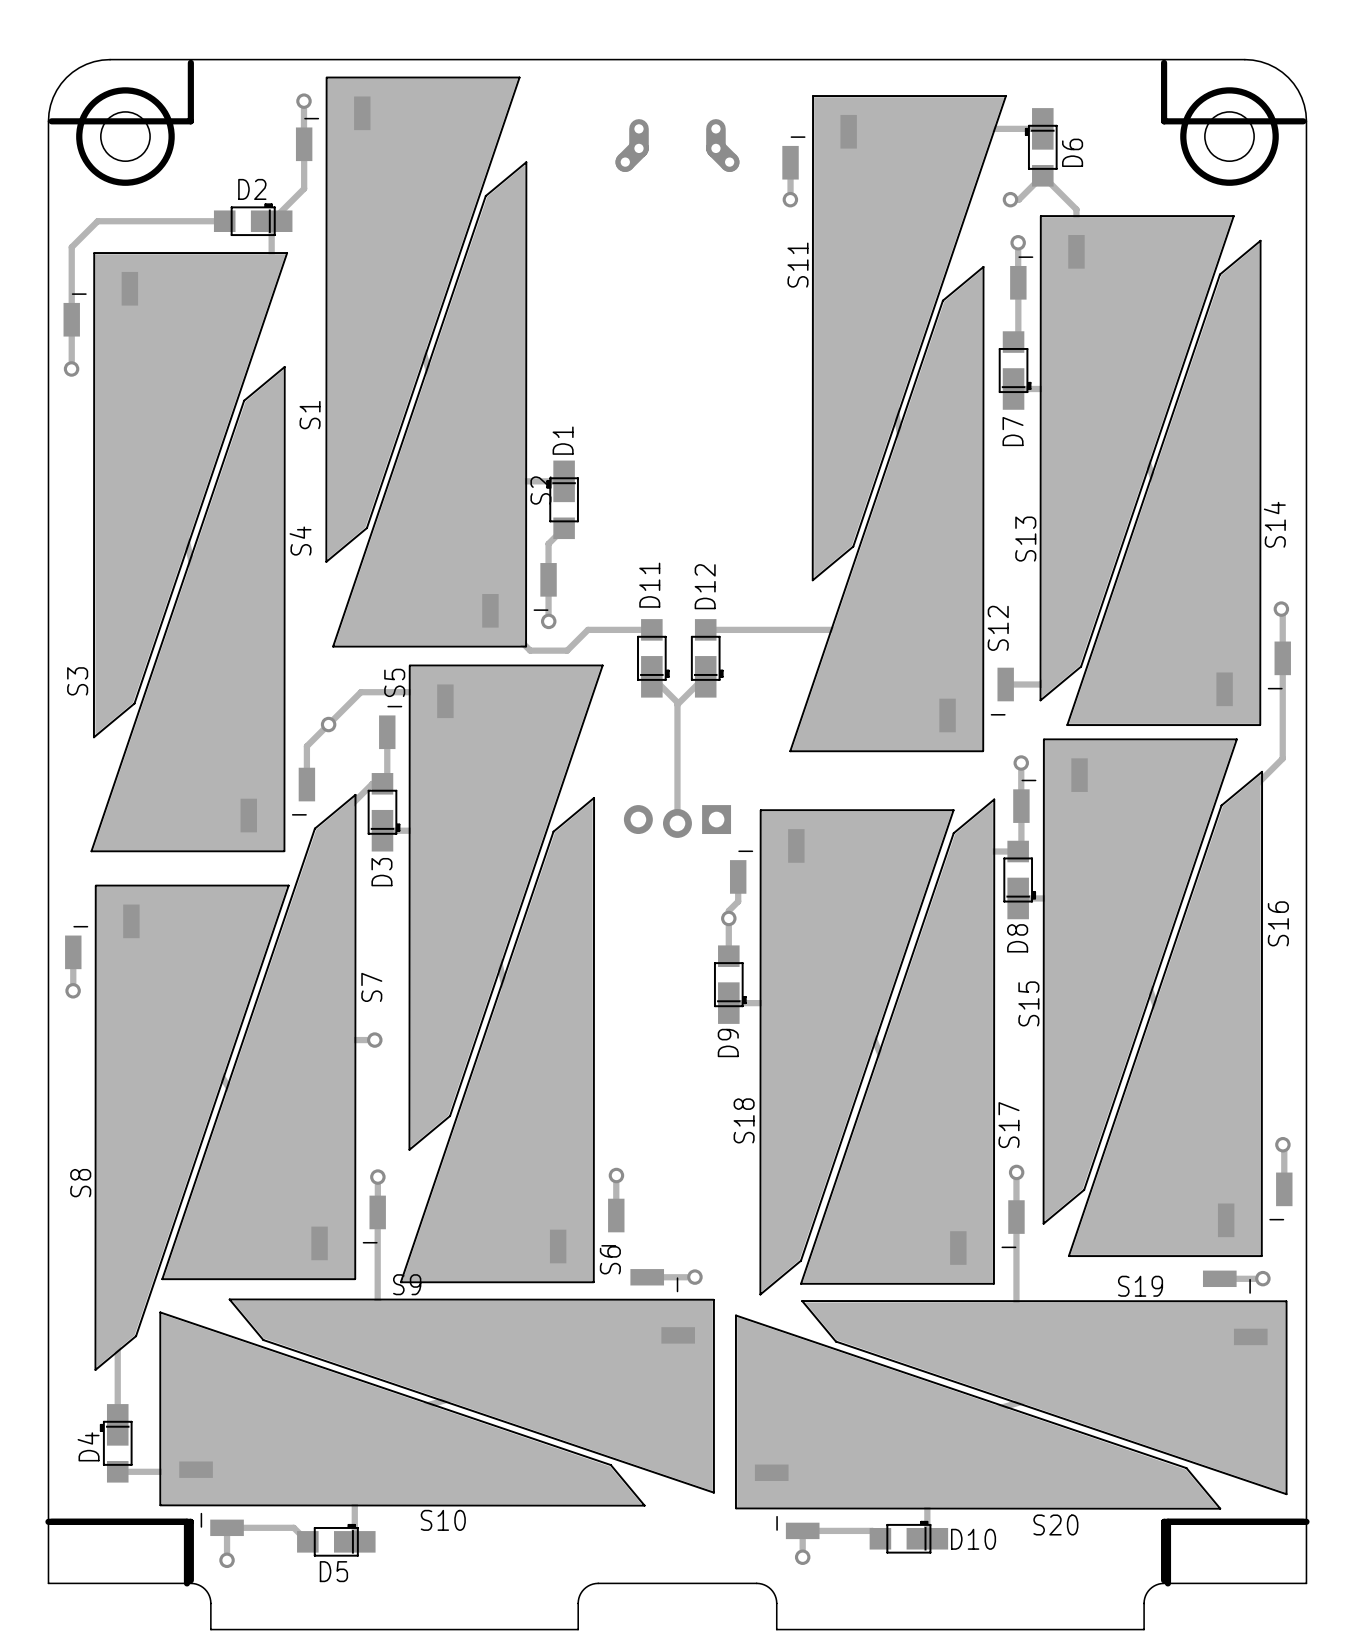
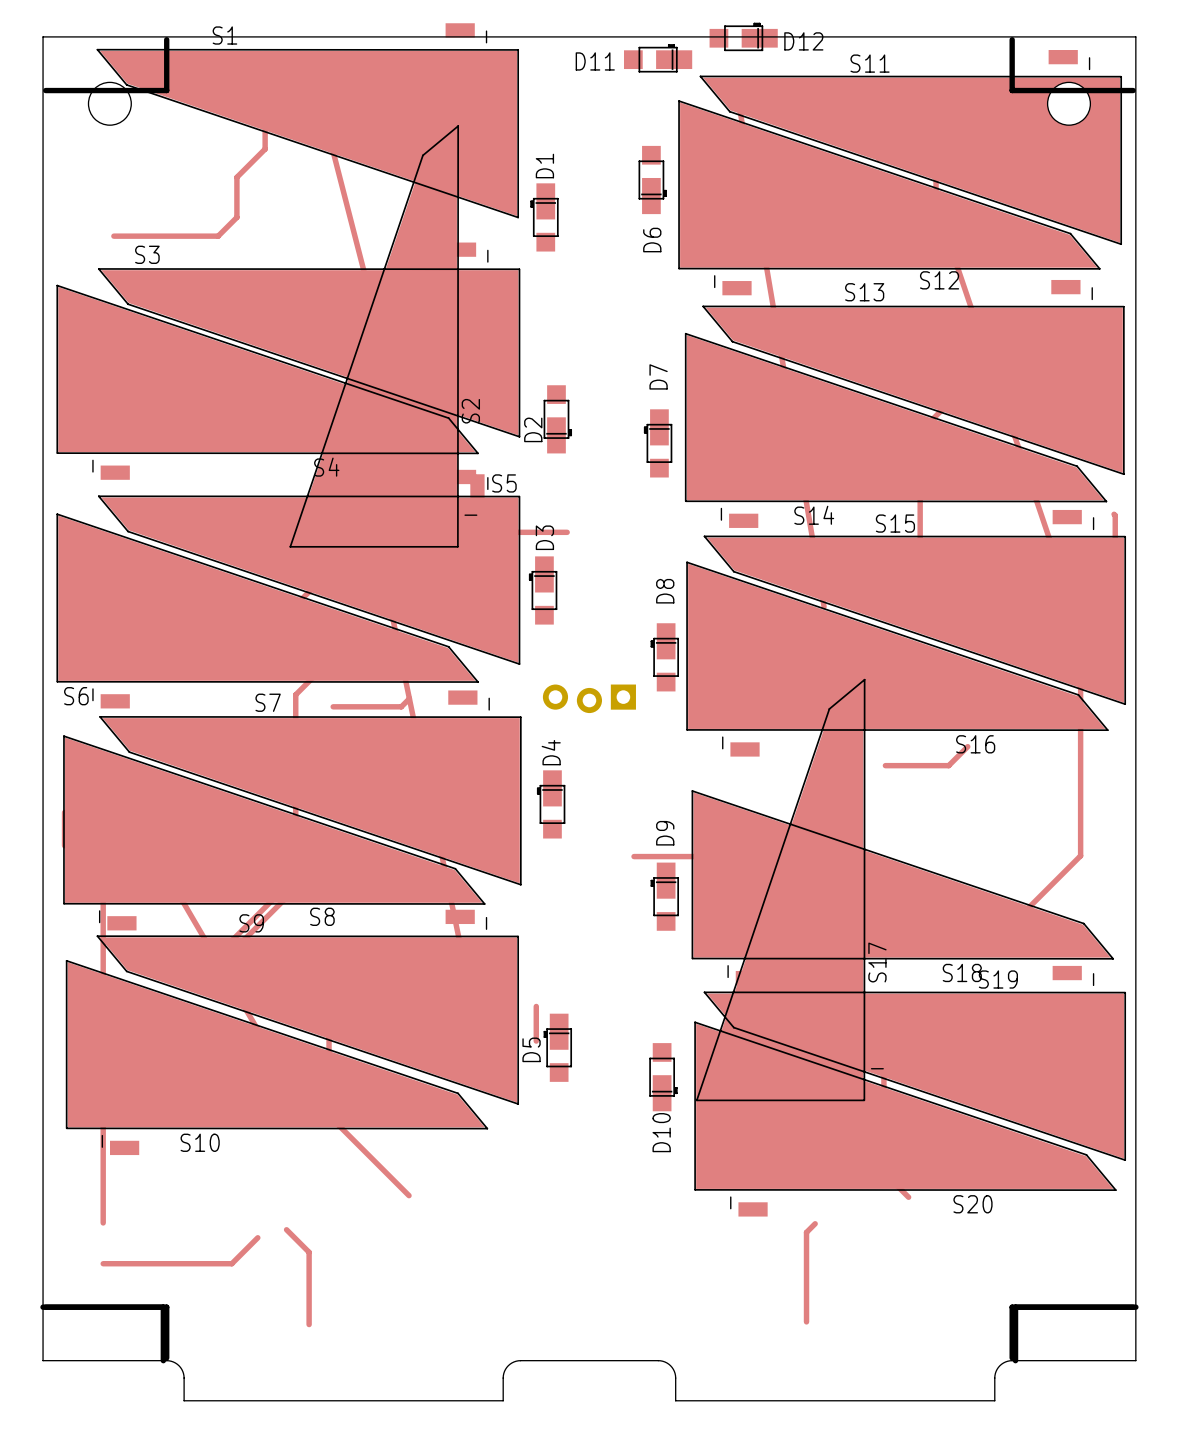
board edge: (110, 59) (86, 64) (66, 77) (53, 97) (48, 121) -> (96, 36) (43, 36) (43, 90)
board edge: (1244, 59) (1268, 64) (1288, 77) (1301, 97) (1306, 121) -> (1082, 36) (1135, 36) (1135, 90)
S1 footprint: [295, 76, 521, 563] -> [96, 23, 520, 219]
drawing: [76, 87, 175, 186] -> none
drawing: [1180, 87, 1279, 186] -> none
S11 footprint: [782, 95, 1007, 582] -> [699, 49, 1123, 246]
via: (303, 101) -> none
part: (632, 145) -> none
part: (722, 145) -> none
D6 rotation: 0° (1041, 147) -> 180° (652, 180)
D6 position: (1041, 147) -> (652, 180)
D6 name position: D6 (1072, 152) -> D6 (652, 240)
D2 name position: D2 (252, 189) -> D2 (533, 429)
via: (790, 199) -> none
via: (1010, 199) -> none
S13 footprint: [1010, 215, 1235, 702] -> [702, 279, 1125, 476]
D2 rotation: 0° (253, 219) -> 90° clockwise (557, 419)
D2 position: (253, 219) -> (557, 419)
track: (224, 221) (97, 221) (71, 247) (71, 368) -> none
S14 footprint: [1066, 239, 1291, 727] -> [684, 332, 1108, 528]
via: (1018, 242) -> none
S3 footprint: [63, 252, 289, 739] -> [97, 242, 521, 438]
S12 footprint: [789, 265, 1014, 753] -> [678, 100, 1101, 296]
S11 name position: S11 (797, 265) -> S11 (870, 63)
track: (1018, 282) (1018, 337) (1013, 342) -> none
S4 footprint: [90, 366, 316, 853] -> [56, 284, 479, 480]
via: (71, 368) -> none
D7 rotation: 0° (1015, 370) -> 180° (658, 443)
D7 position: (1015, 370) -> (658, 443)
S1 name position: S1 (310, 415) -> S1 (224, 35)
D1 position: (562, 499) -> (544, 217)
S14 name position: S14 (1274, 524) -> S14 (814, 515)
track: (564, 528) (548, 543) (548, 621) -> none
S13 name position: S13 (1025, 539) -> S13 (864, 292)
S4 name position: S4 (300, 541) -> S4 (326, 467)
D12 name position: D12 (705, 586) -> D12 (803, 41)
via: (1281, 609) -> none
via: (548, 621) -> none
track: (931, 621) (923, 629) (705, 629) -> none
S12 name position: S12 (998, 628) -> S12 (939, 280)
D11 rotation: 0° (653, 658) -> 90° counterclockwise (658, 58)
D11 position: (653, 658) -> (658, 58)
D12 rotation: 0° (707, 658) -> 90° counterclockwise (743, 36)
D12 position: (707, 658) -> (743, 36)
S5 footprint: [379, 664, 604, 1151] -> [97, 469, 521, 665]
track: (651, 676) (677, 702) (677, 823) -> none
track: (705, 676) (677, 704) -> none
S3 name position: S3 (77, 681) -> S3 (147, 254)
S5 name position: S5 (394, 682) -> S5 (504, 483)
via: (328, 724) -> none
S15 footprint: [1013, 738, 1238, 1225] -> [703, 509, 1127, 706]
via: (1021, 763) -> none
S16 footprint: [1067, 770, 1293, 1258] -> [686, 561, 1109, 757]
S6 footprint: [399, 796, 625, 1284] -> [56, 513, 479, 709]
D3 rotation: 0° (384, 812) -> 180° (543, 590)
D3 position: (384, 812) -> (543, 590)
track: (738, 876) (738, 901) (728, 910) (728, 956) -> none
D8 rotation: 0° (1019, 879) -> 180° (664, 657)
D8 position: (1019, 879) -> (664, 657)
via: (728, 918) -> none
S16 name position: S16 (1278, 923) -> S16 (975, 744)
D9 rotation: 0° (730, 984) -> 180° (664, 896)
D9 position: (730, 984) -> (664, 896)
via: (73, 990) -> none
S15 name position: S15 (1028, 1003) -> S15 (895, 523)
S7 rotation: 0° (273, 1037) -> 90° counterclockwise (310, 788)
via: (374, 1040) -> none
S18 rotation: 0° (842, 1052) -> 90° counterclockwise (902, 887)
S8 rotation: 0° (177, 1127) -> 90° counterclockwise (274, 832)
track: (1282, 1144) (1284, 1189) -> none
via: (1282, 1144) -> none
via: (1016, 1172) -> none
via: (616, 1175) -> none
via: (377, 1177) -> none
S6 name position: S6 (610, 1260) -> S6 (76, 696)
track: (647, 1277) (694, 1277) -> none
via: (694, 1277) -> none
via: (1262, 1278) -> none
S9 position: (471, 1381) -> (307, 1007)
S19 position: (1044, 1382) -> (914, 1063)
S10 position: (402, 1423) -> (276, 1057)
S20 position: (978, 1426) -> (905, 1119)
D4 position: (116, 1443) -> (551, 804)
D4 name position: D4 (88, 1446) -> D4 (551, 752)
S10 name position: S10 (443, 1520) -> S10 (200, 1142)
D10 rotation: 0° (908, 1537) -> 90° clockwise (663, 1077)
D10 position: (908, 1537) -> (663, 1077)
track: (880, 1538) (872, 1530) (802, 1530) (802, 1557) -> none
D5 rotation: 0° (336, 1540) -> 90° counterclockwise (557, 1047)
D5 position: (336, 1540) -> (557, 1047)
track: (307, 1541) (293, 1527) (227, 1527) (227, 1560) -> none
via: (802, 1557) -> none
via: (227, 1560) -> none
D5 name position: D5 (333, 1571) -> D5 (531, 1049)

